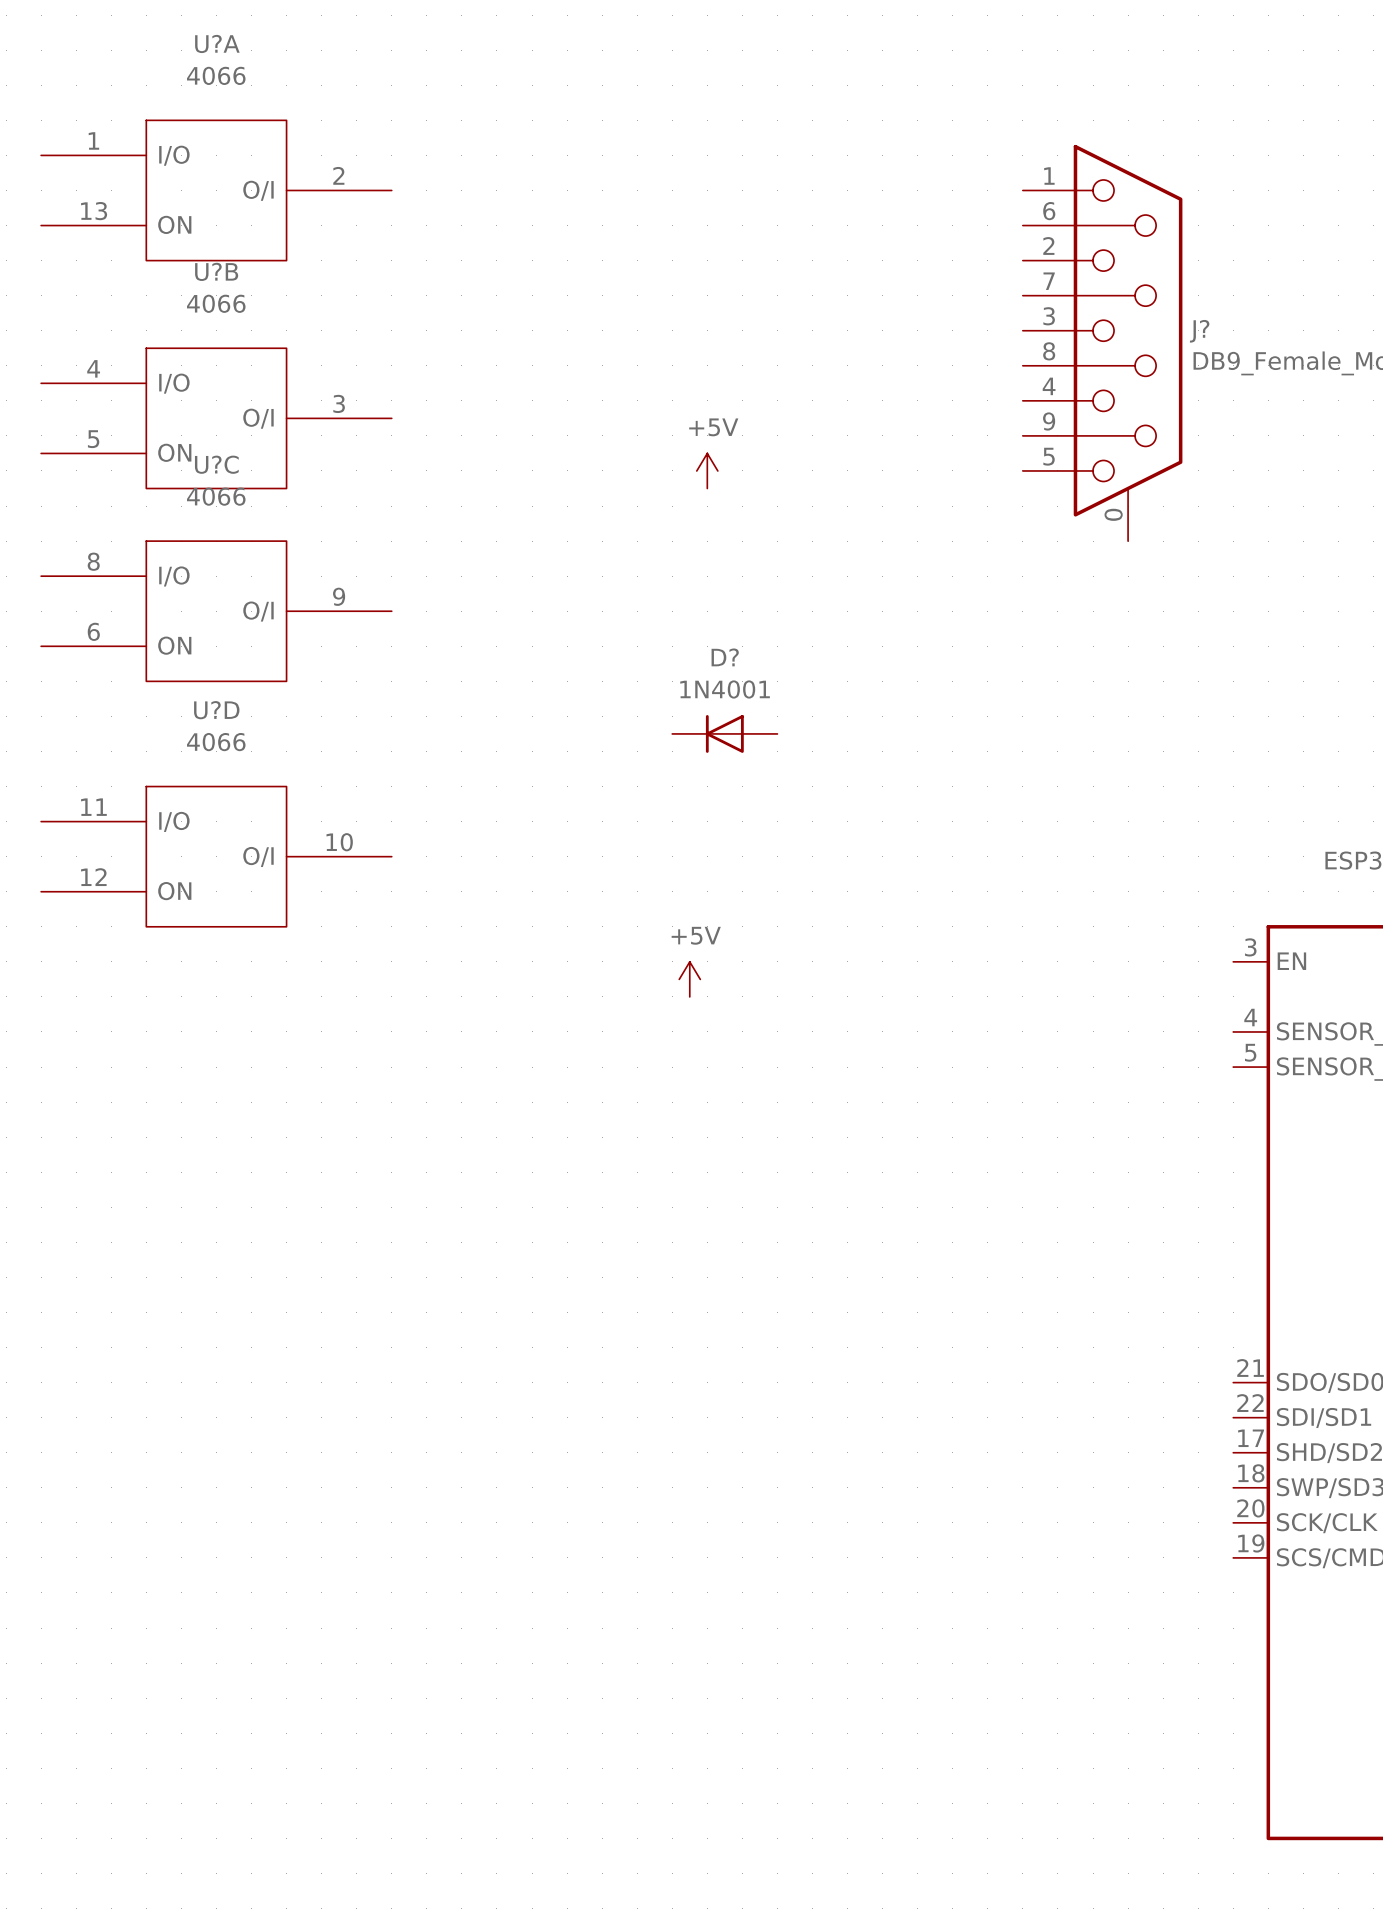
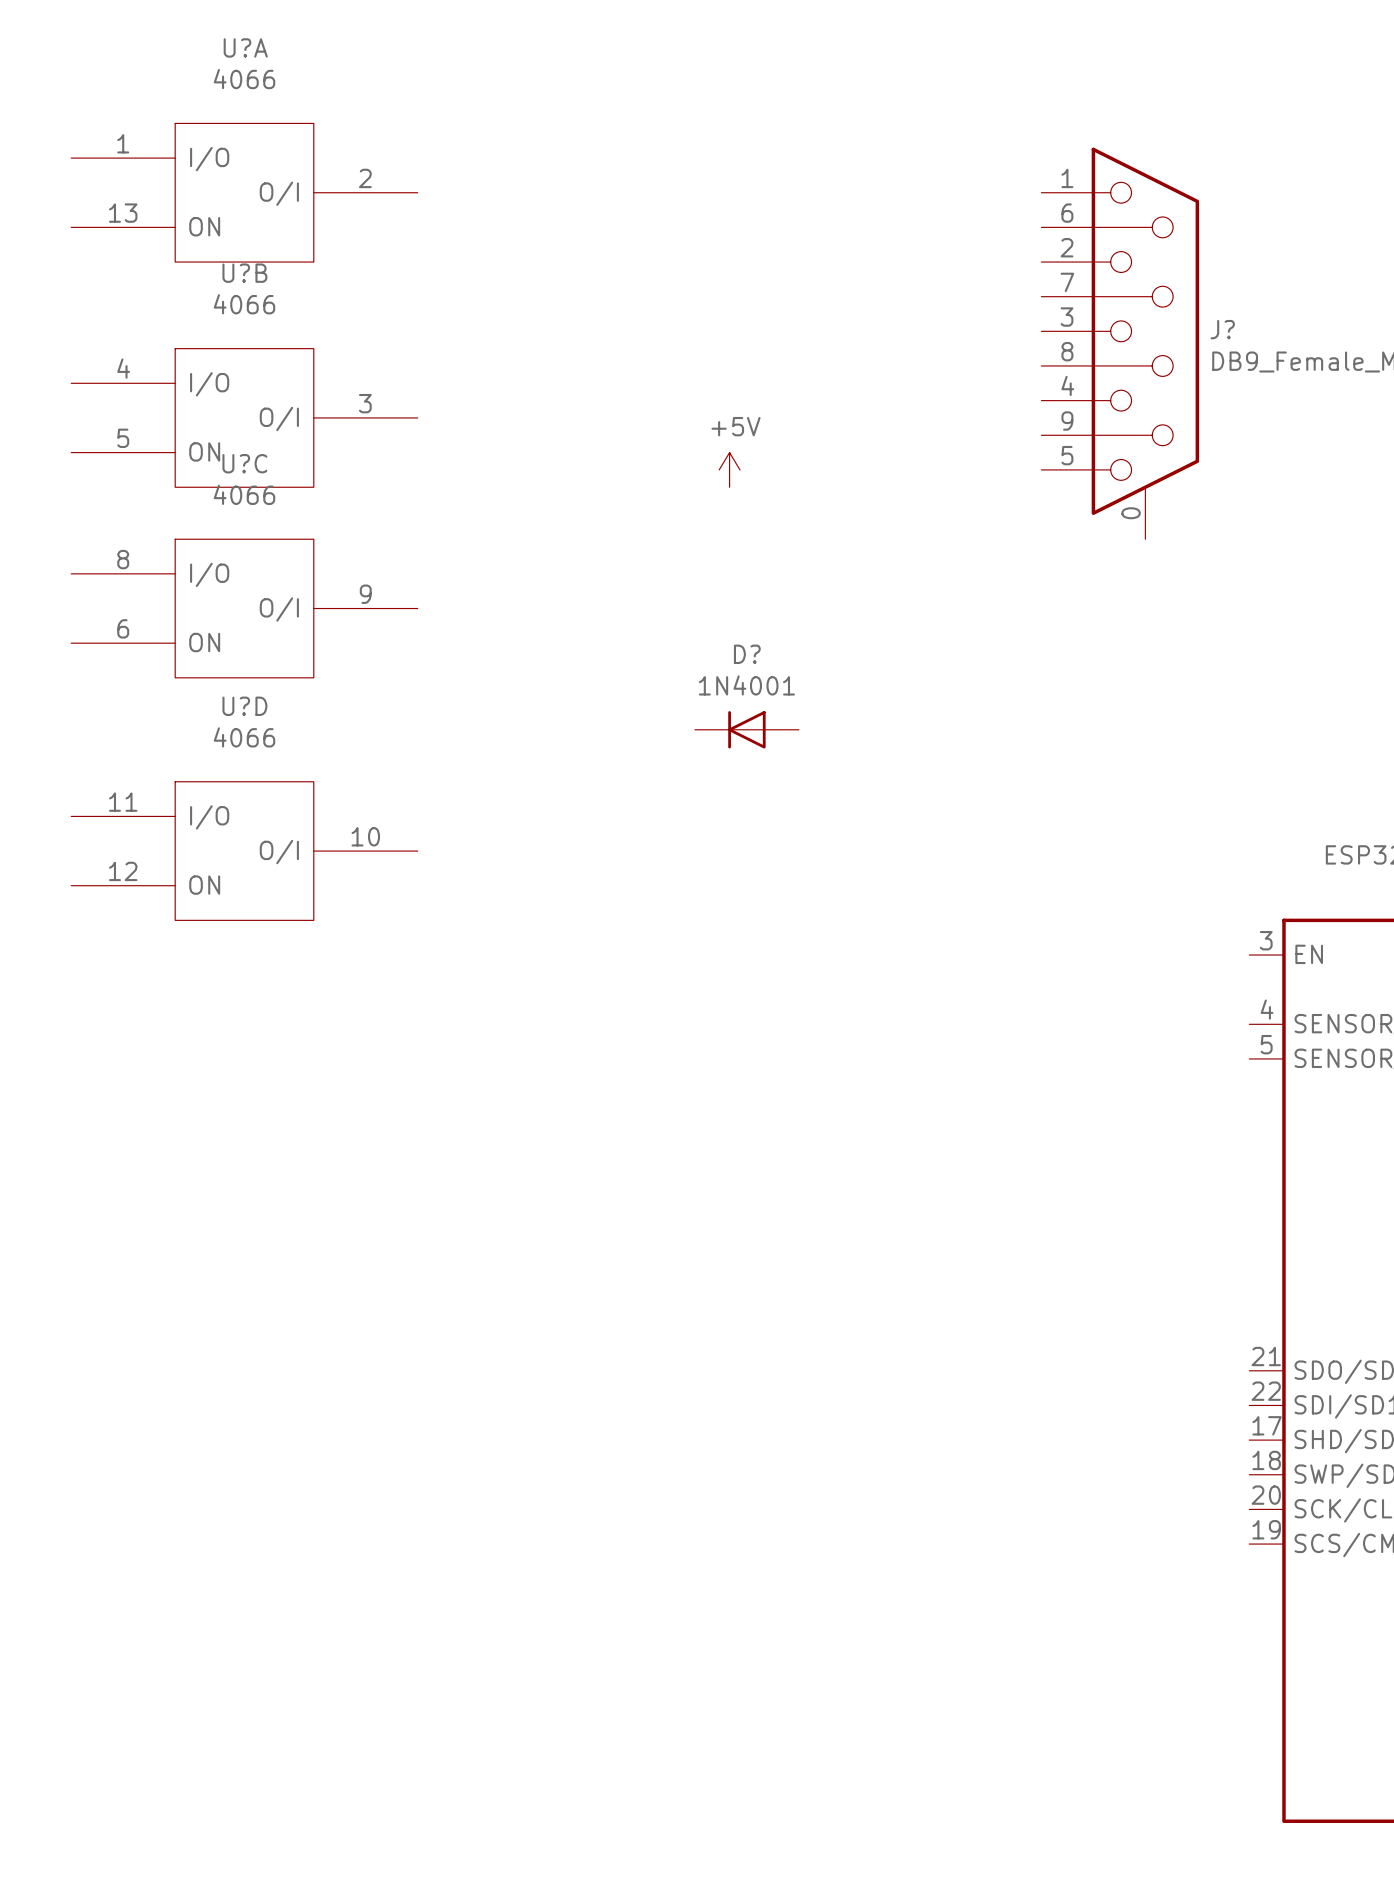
power symbol: +5V (689, 979) -> none

